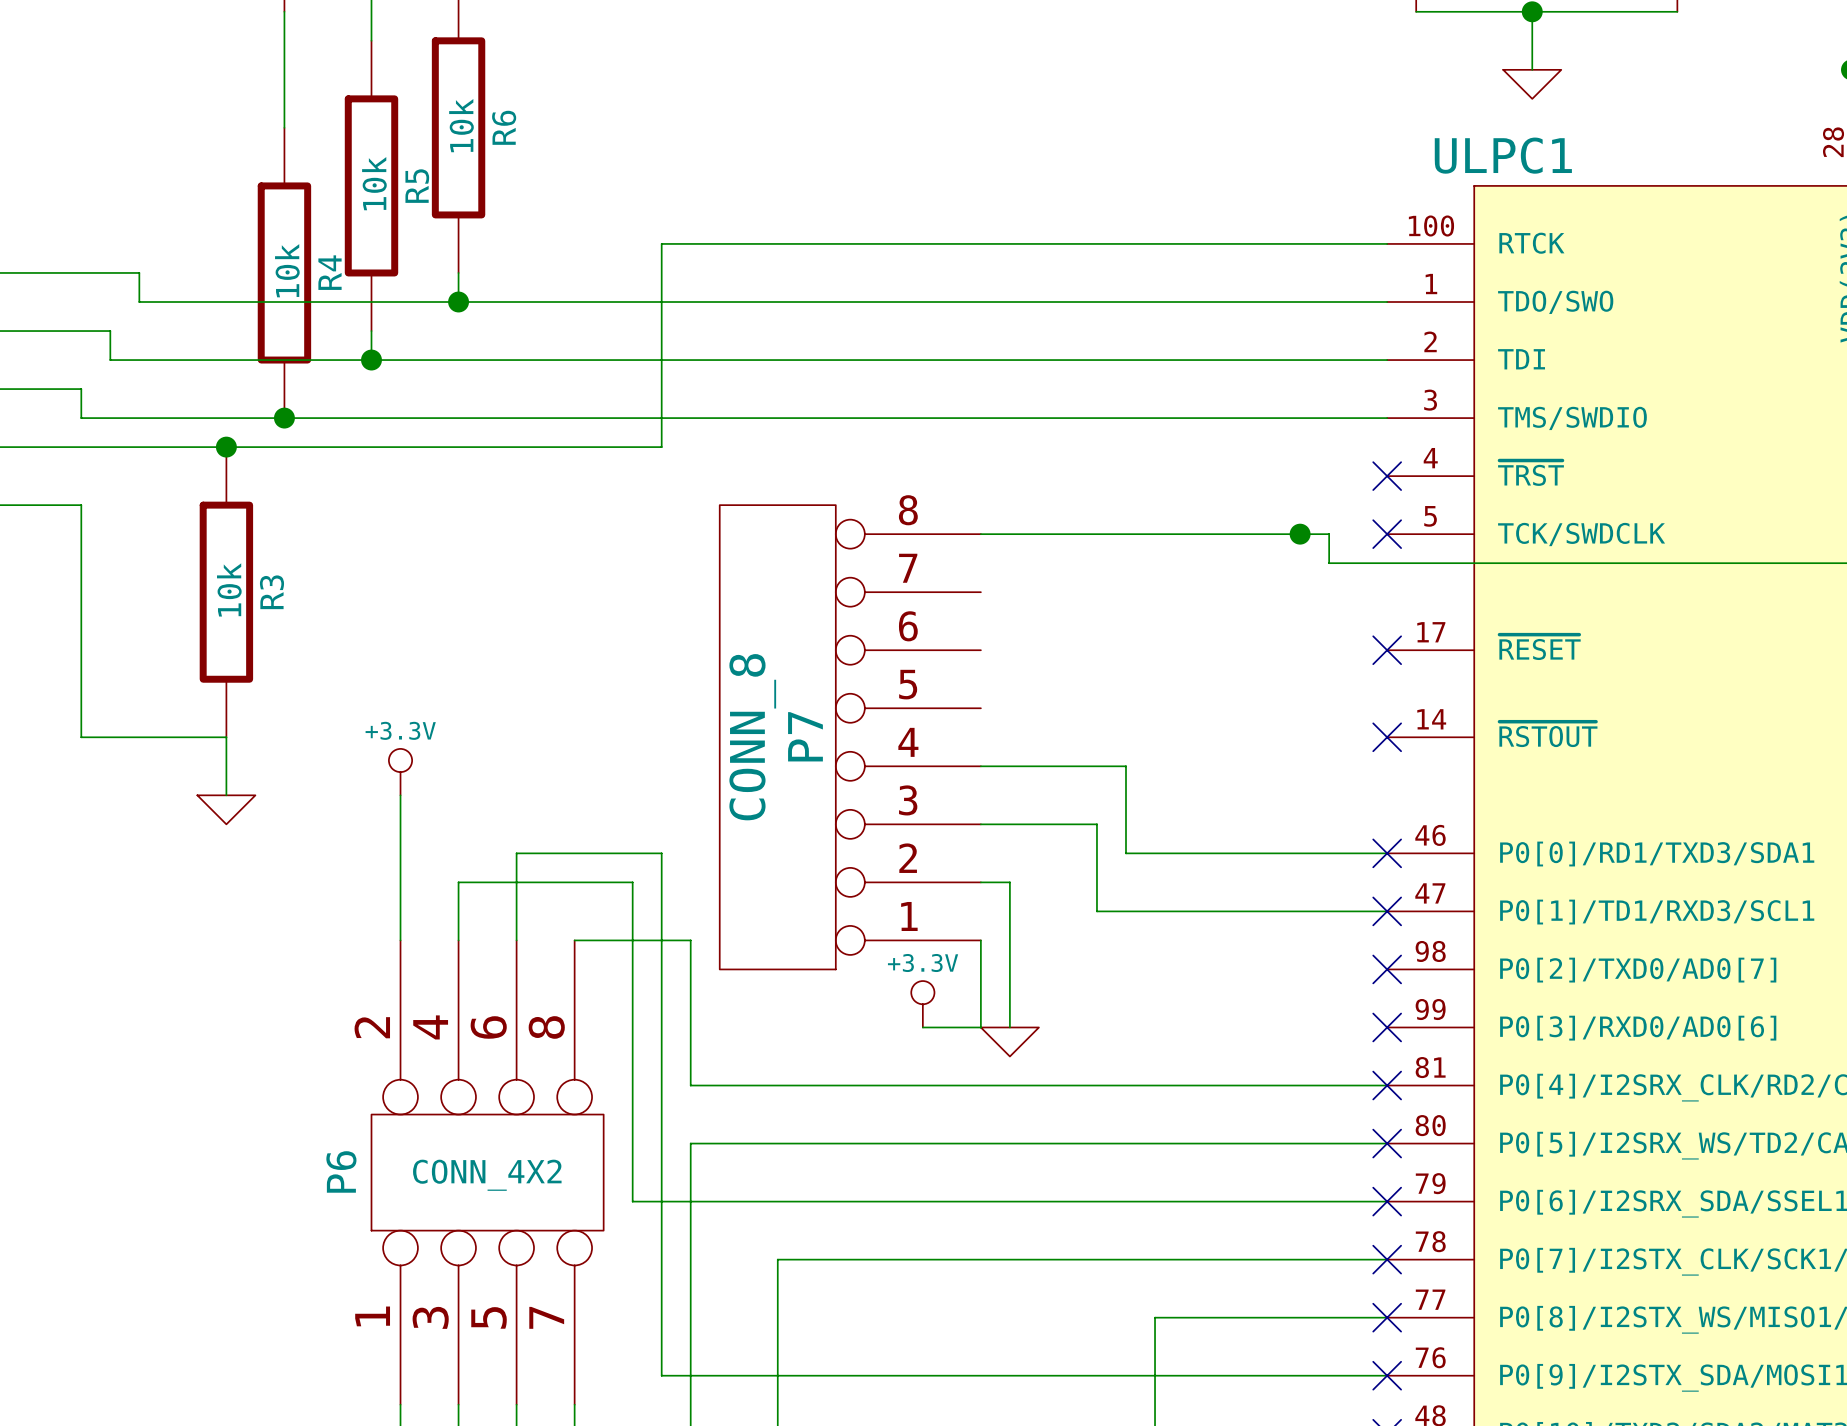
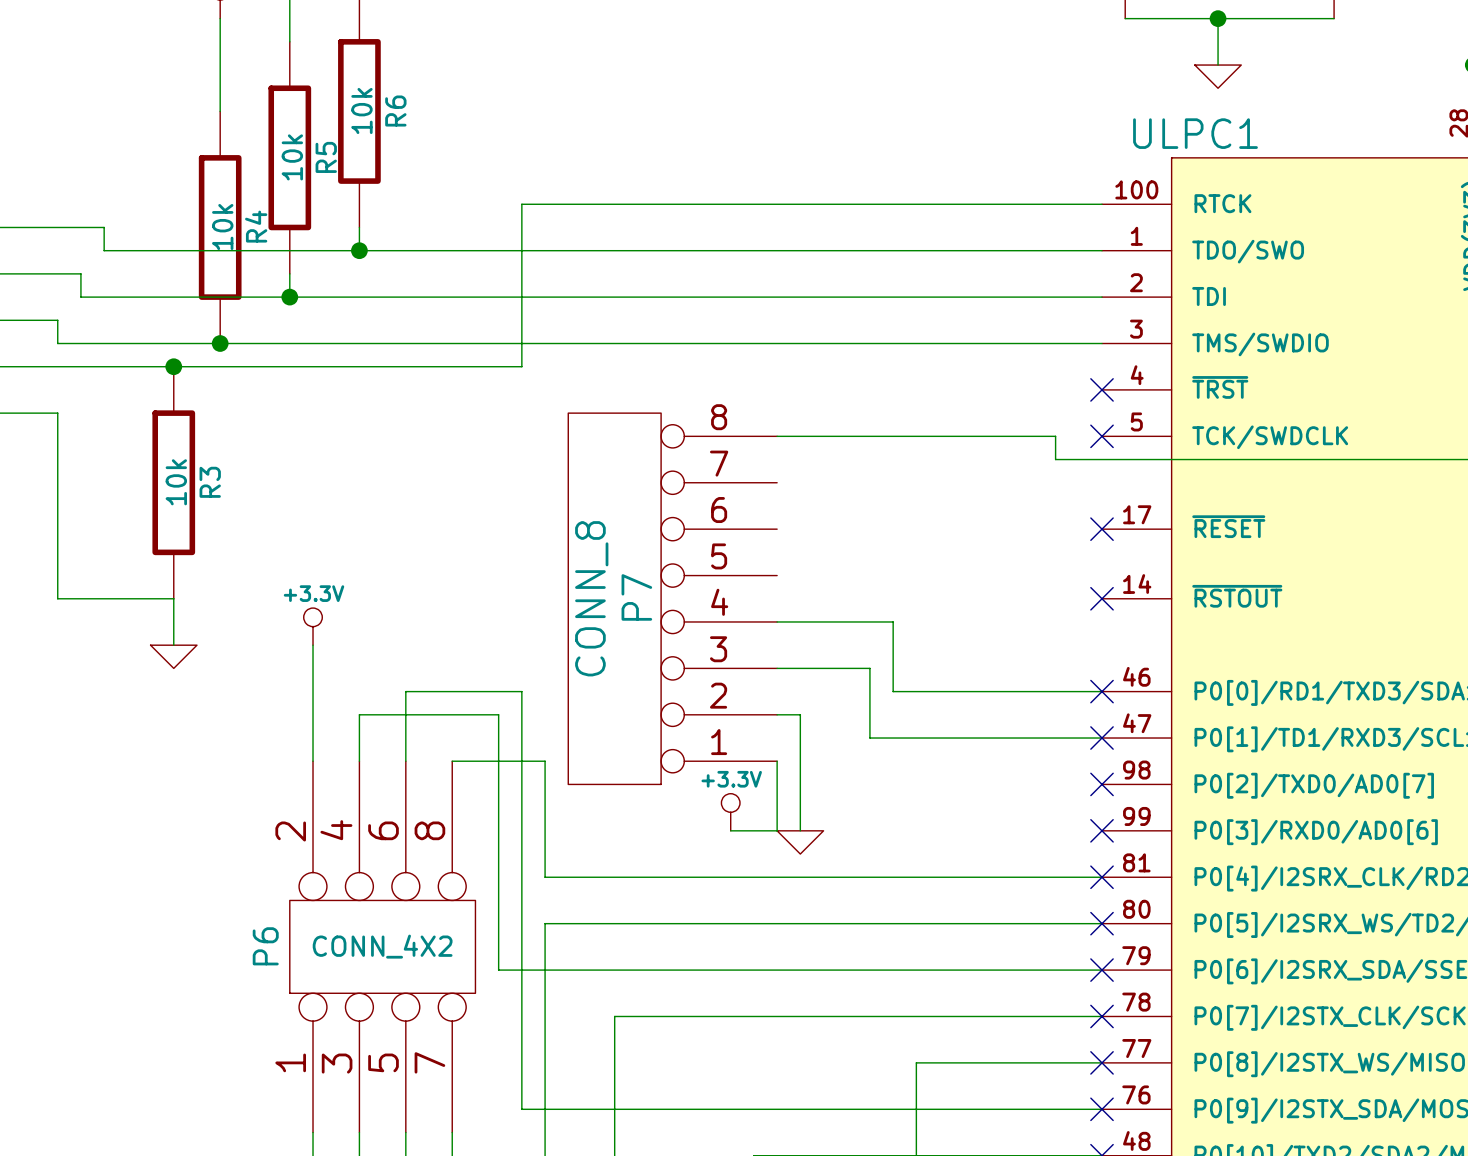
junction: (1300, 534) -> none

